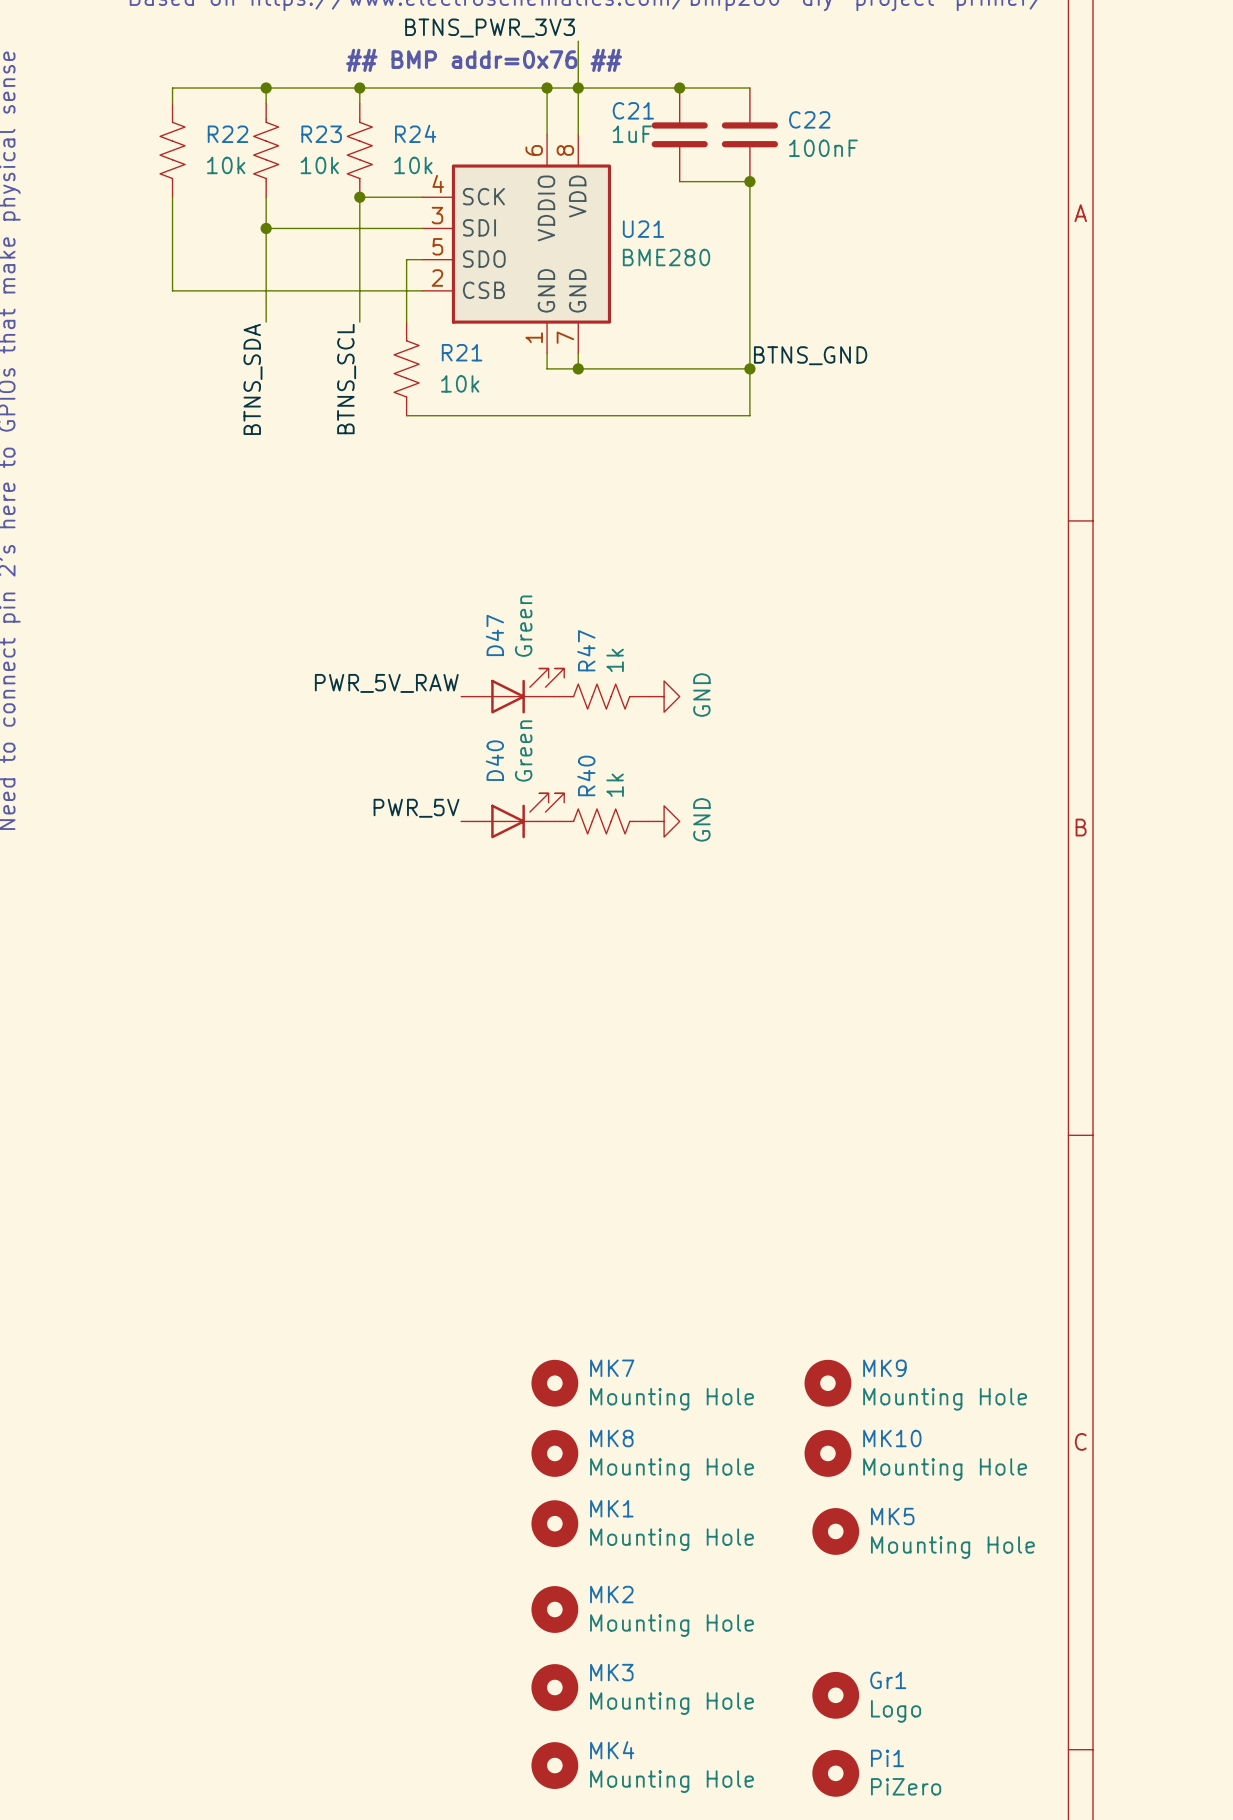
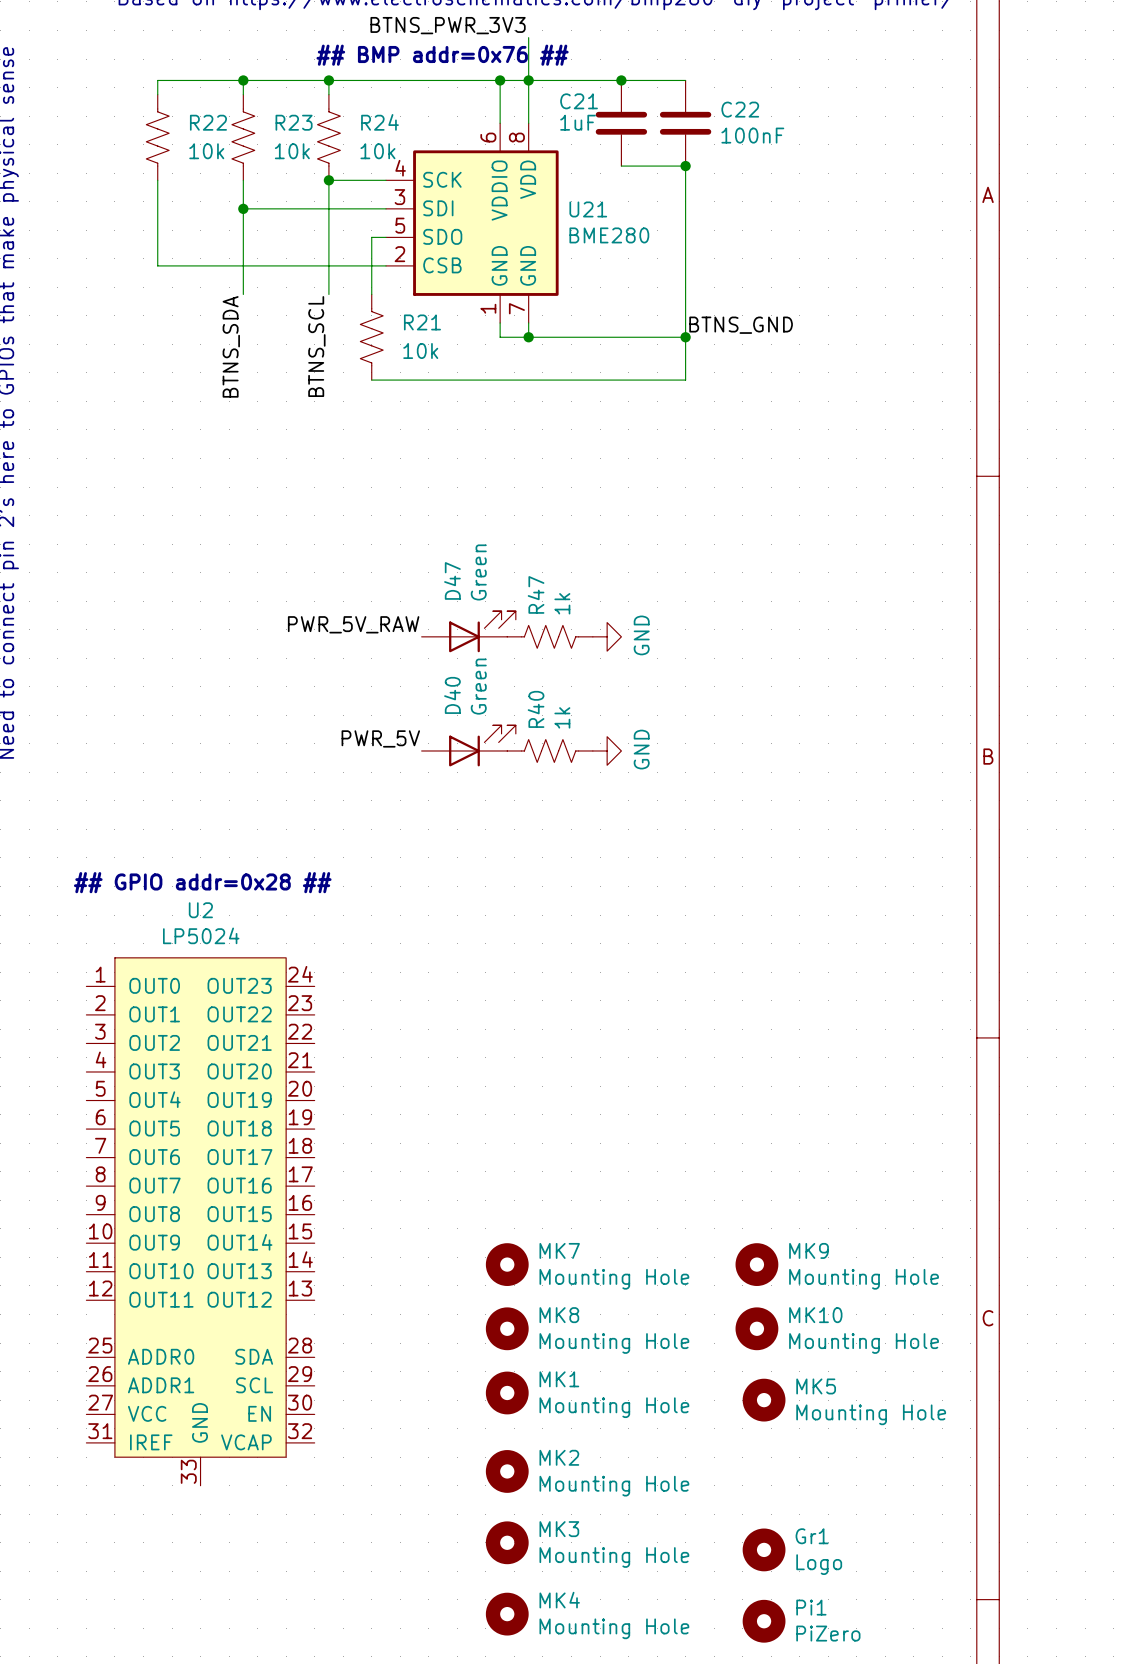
text: none -> ## GPIO addr=0x28 ## (202, 882)
U2: none -> LP5024 (200, 1221)

